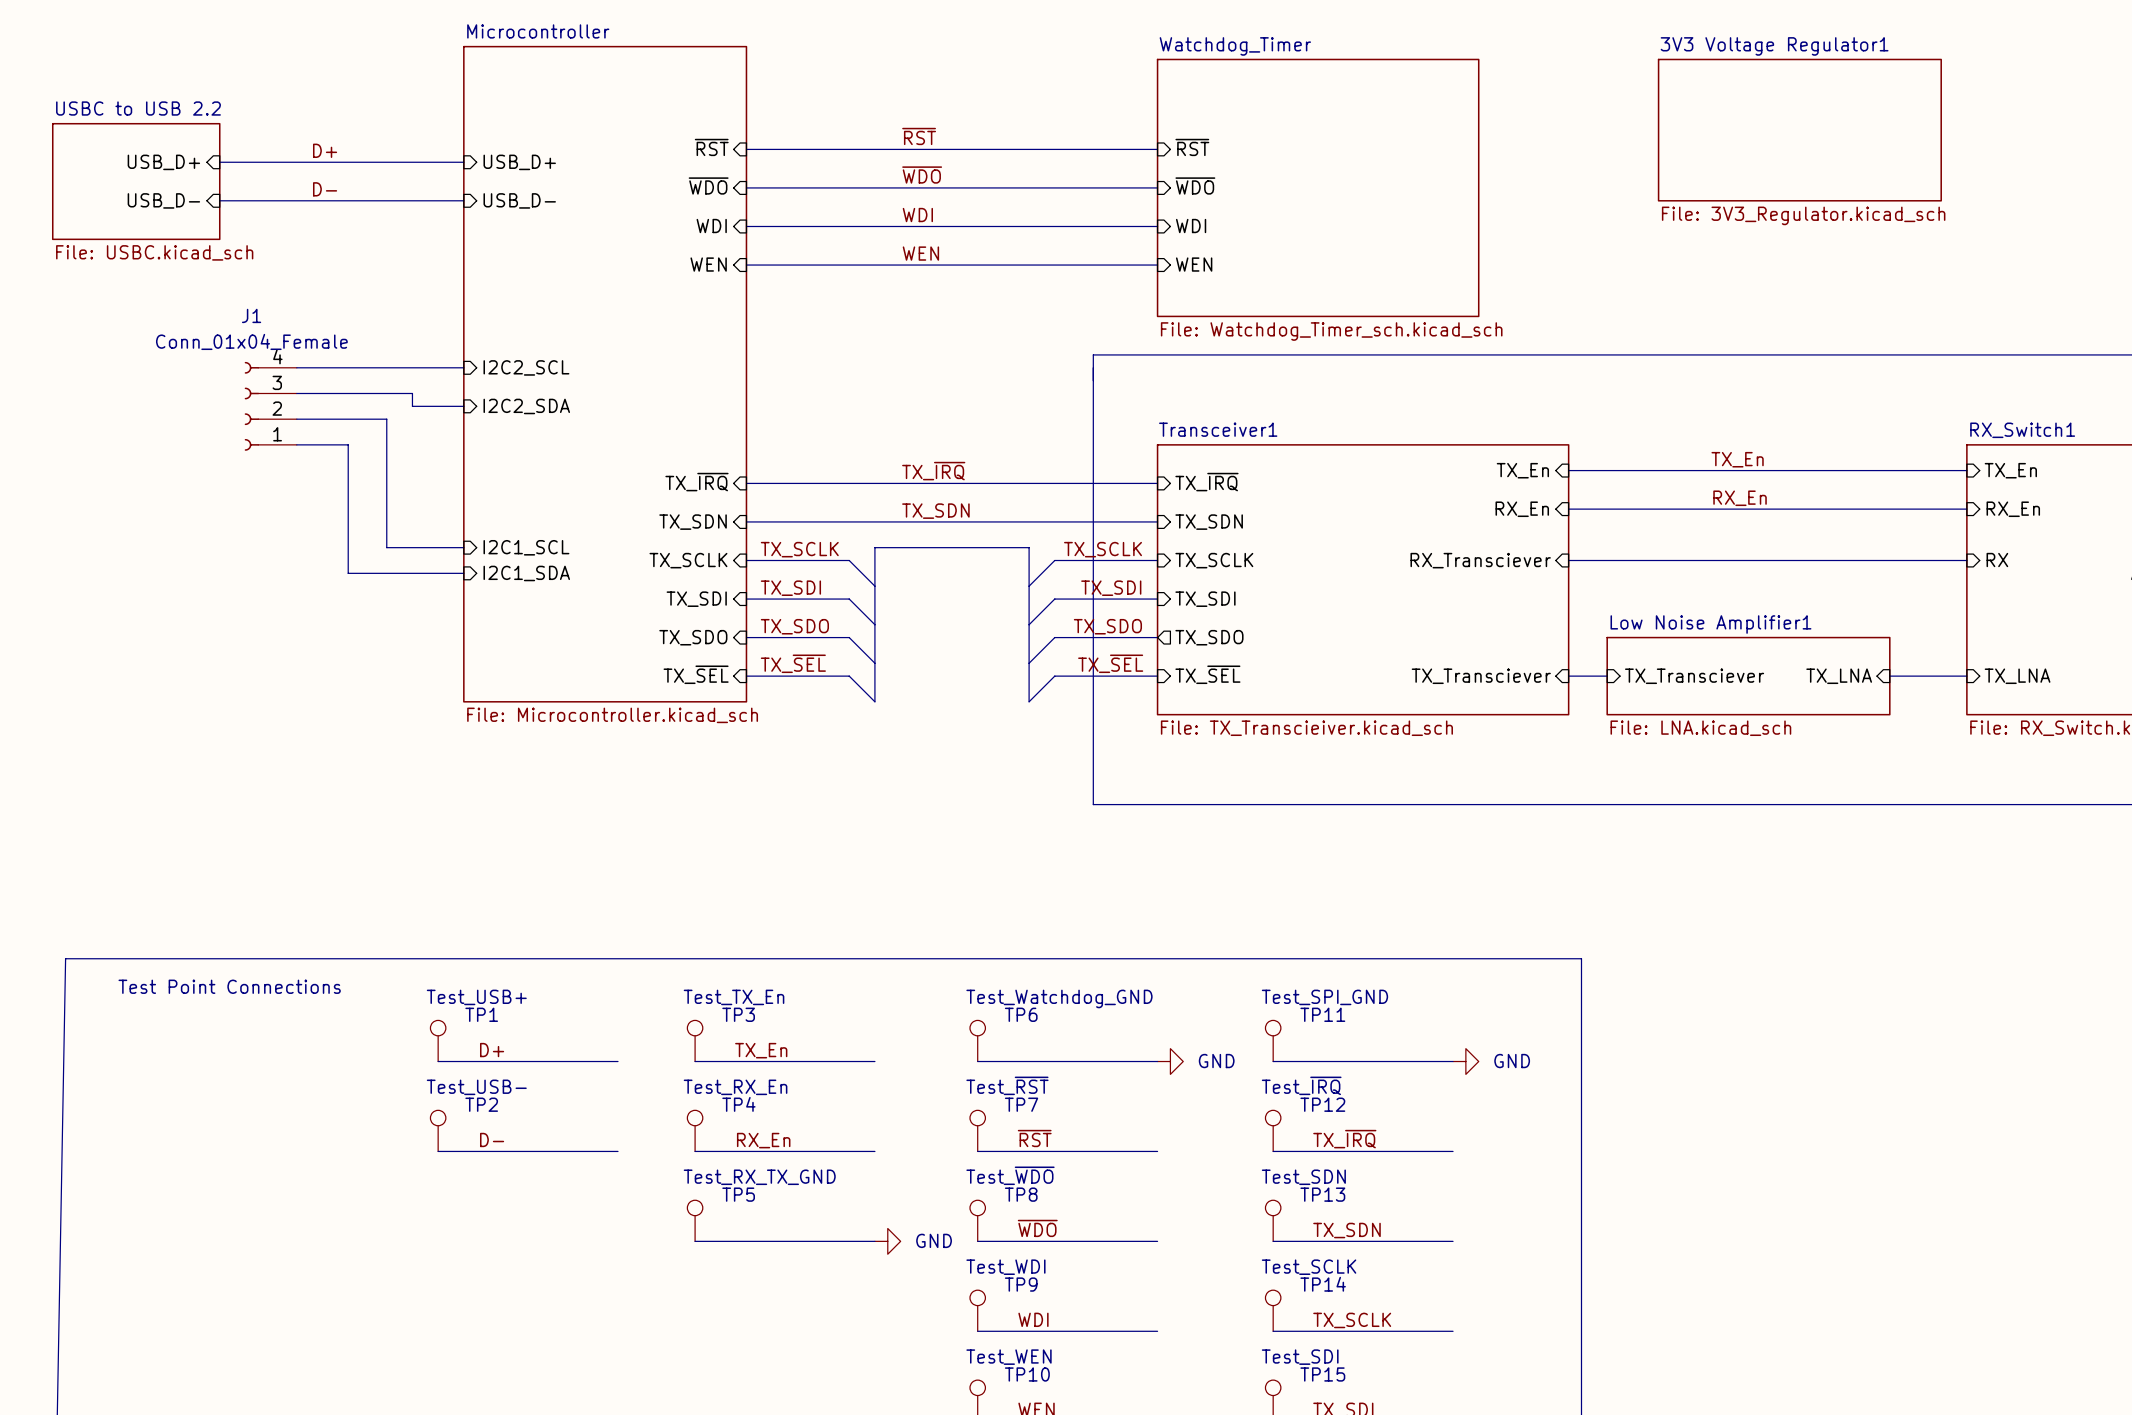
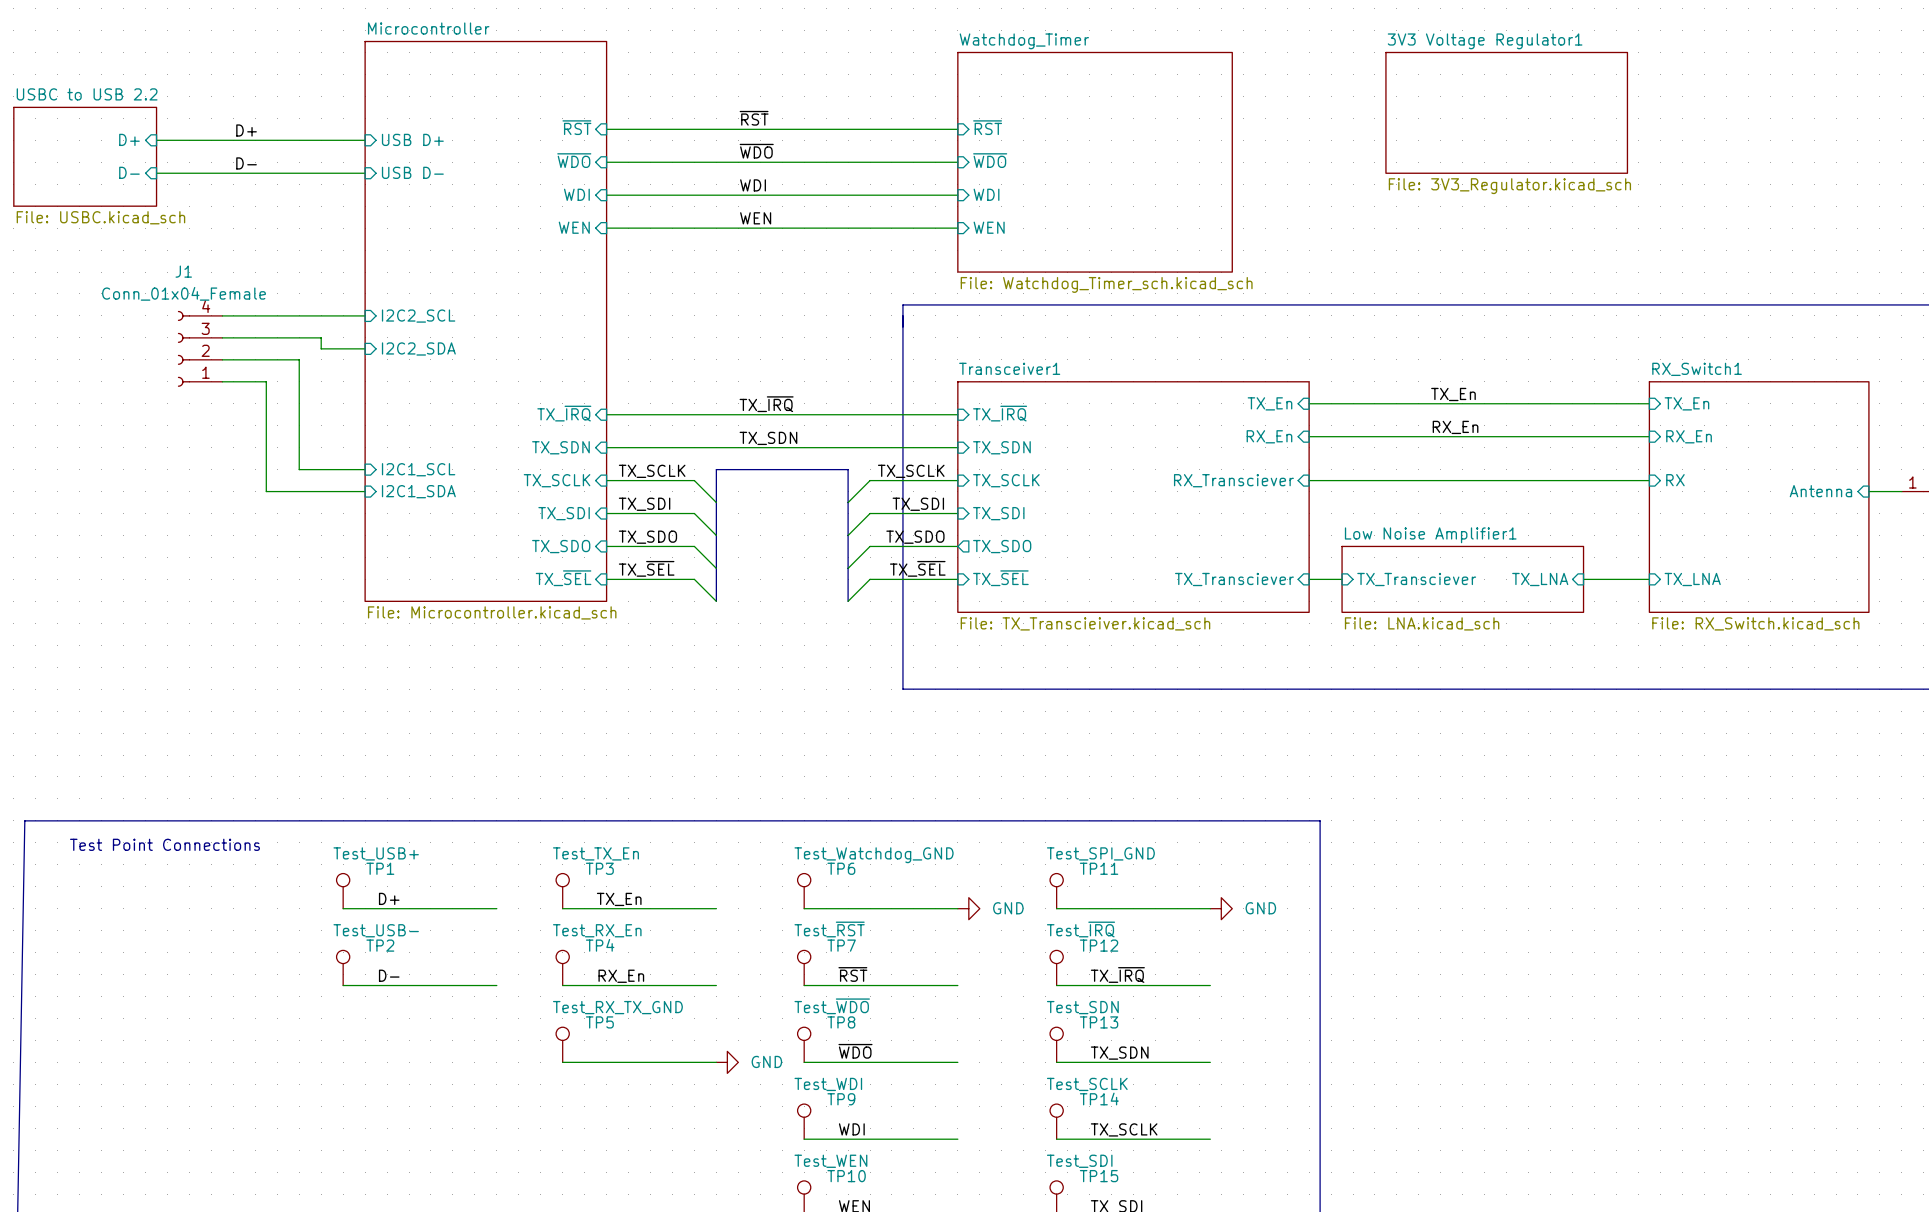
sheet pin: USB_D+ (163, 162) -> D+ (129, 139)
sheet pin: USB_D+ (519, 162) -> USB D+ (412, 139)
sheet pin: USB_D- (163, 200) -> D- (129, 172)
sheet pin: USB_D- (519, 200) -> USB D- (412, 172)

